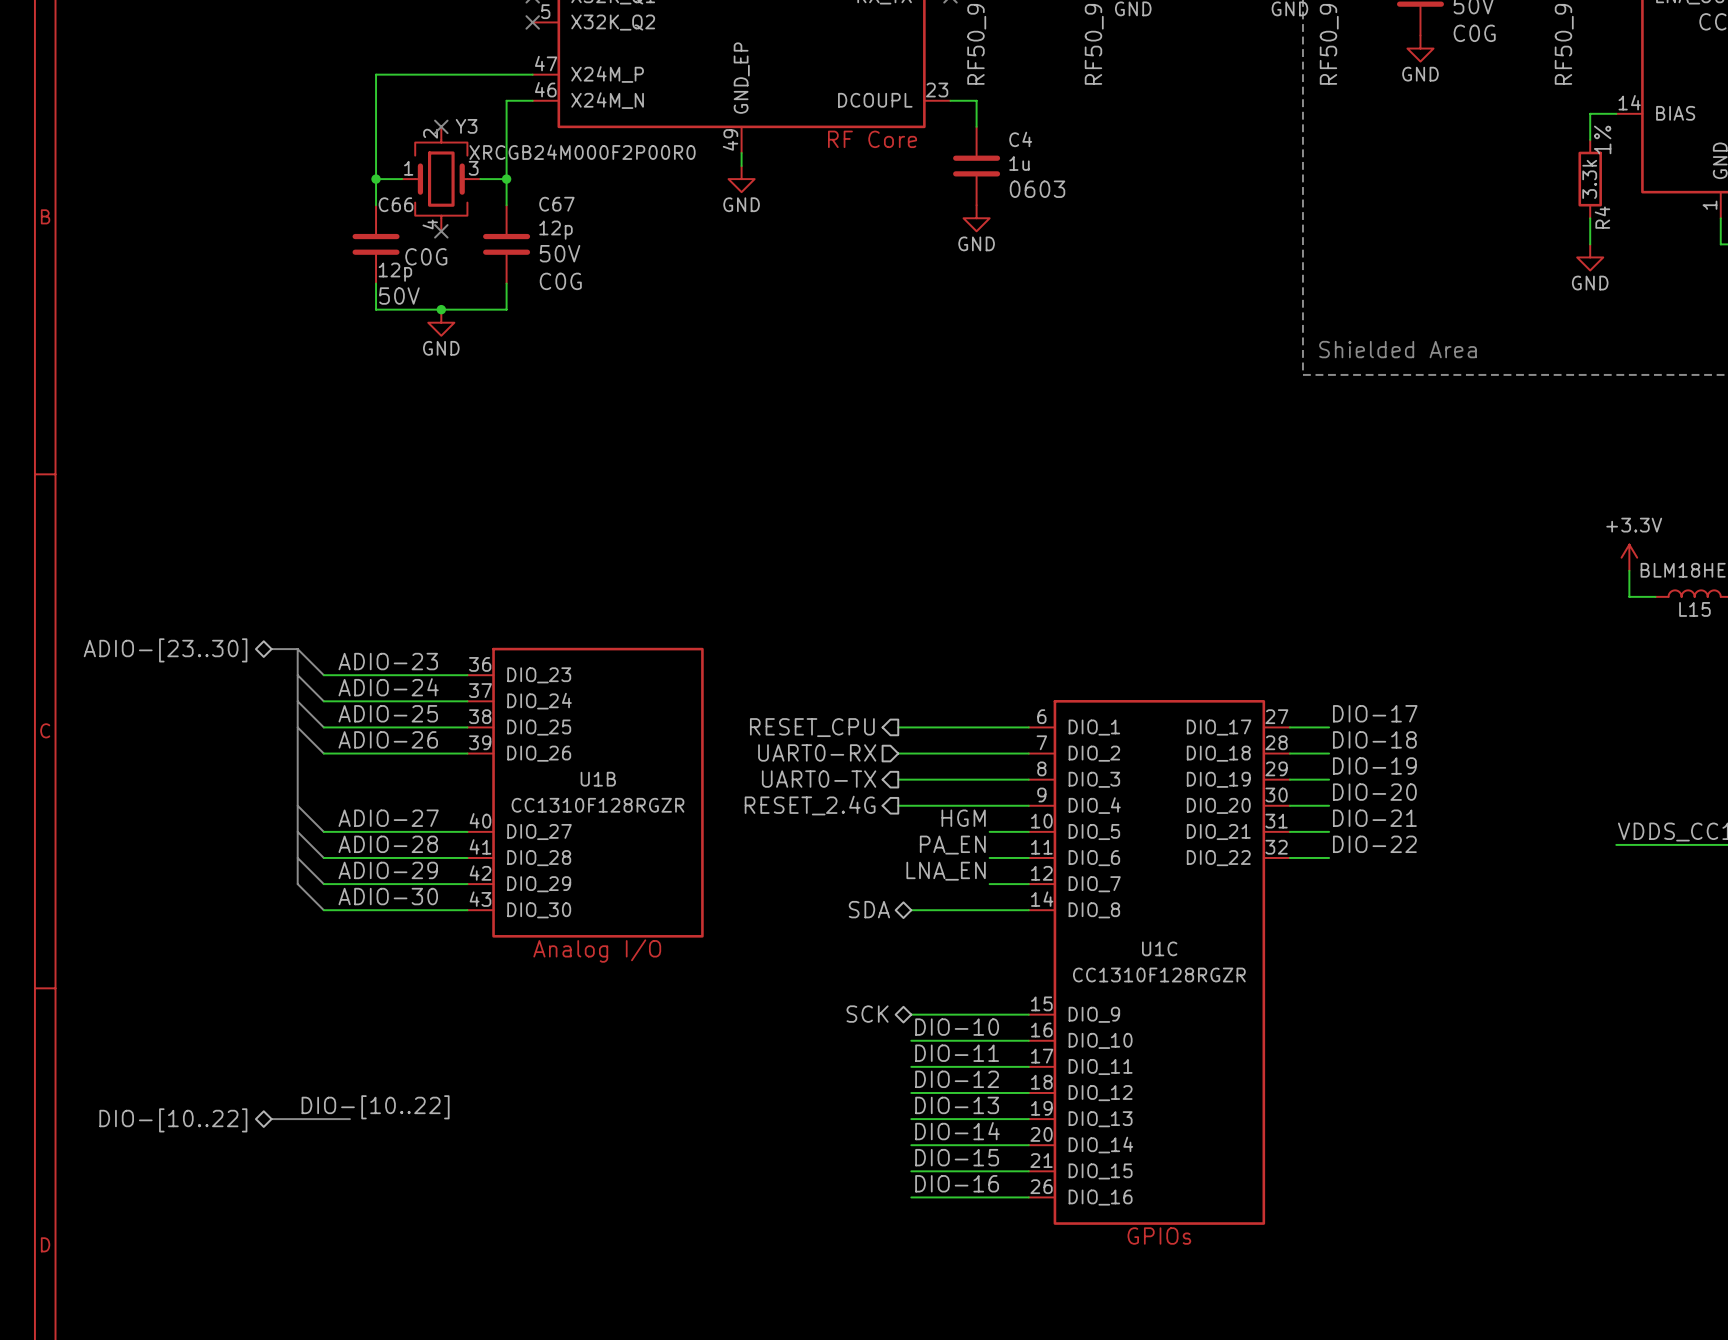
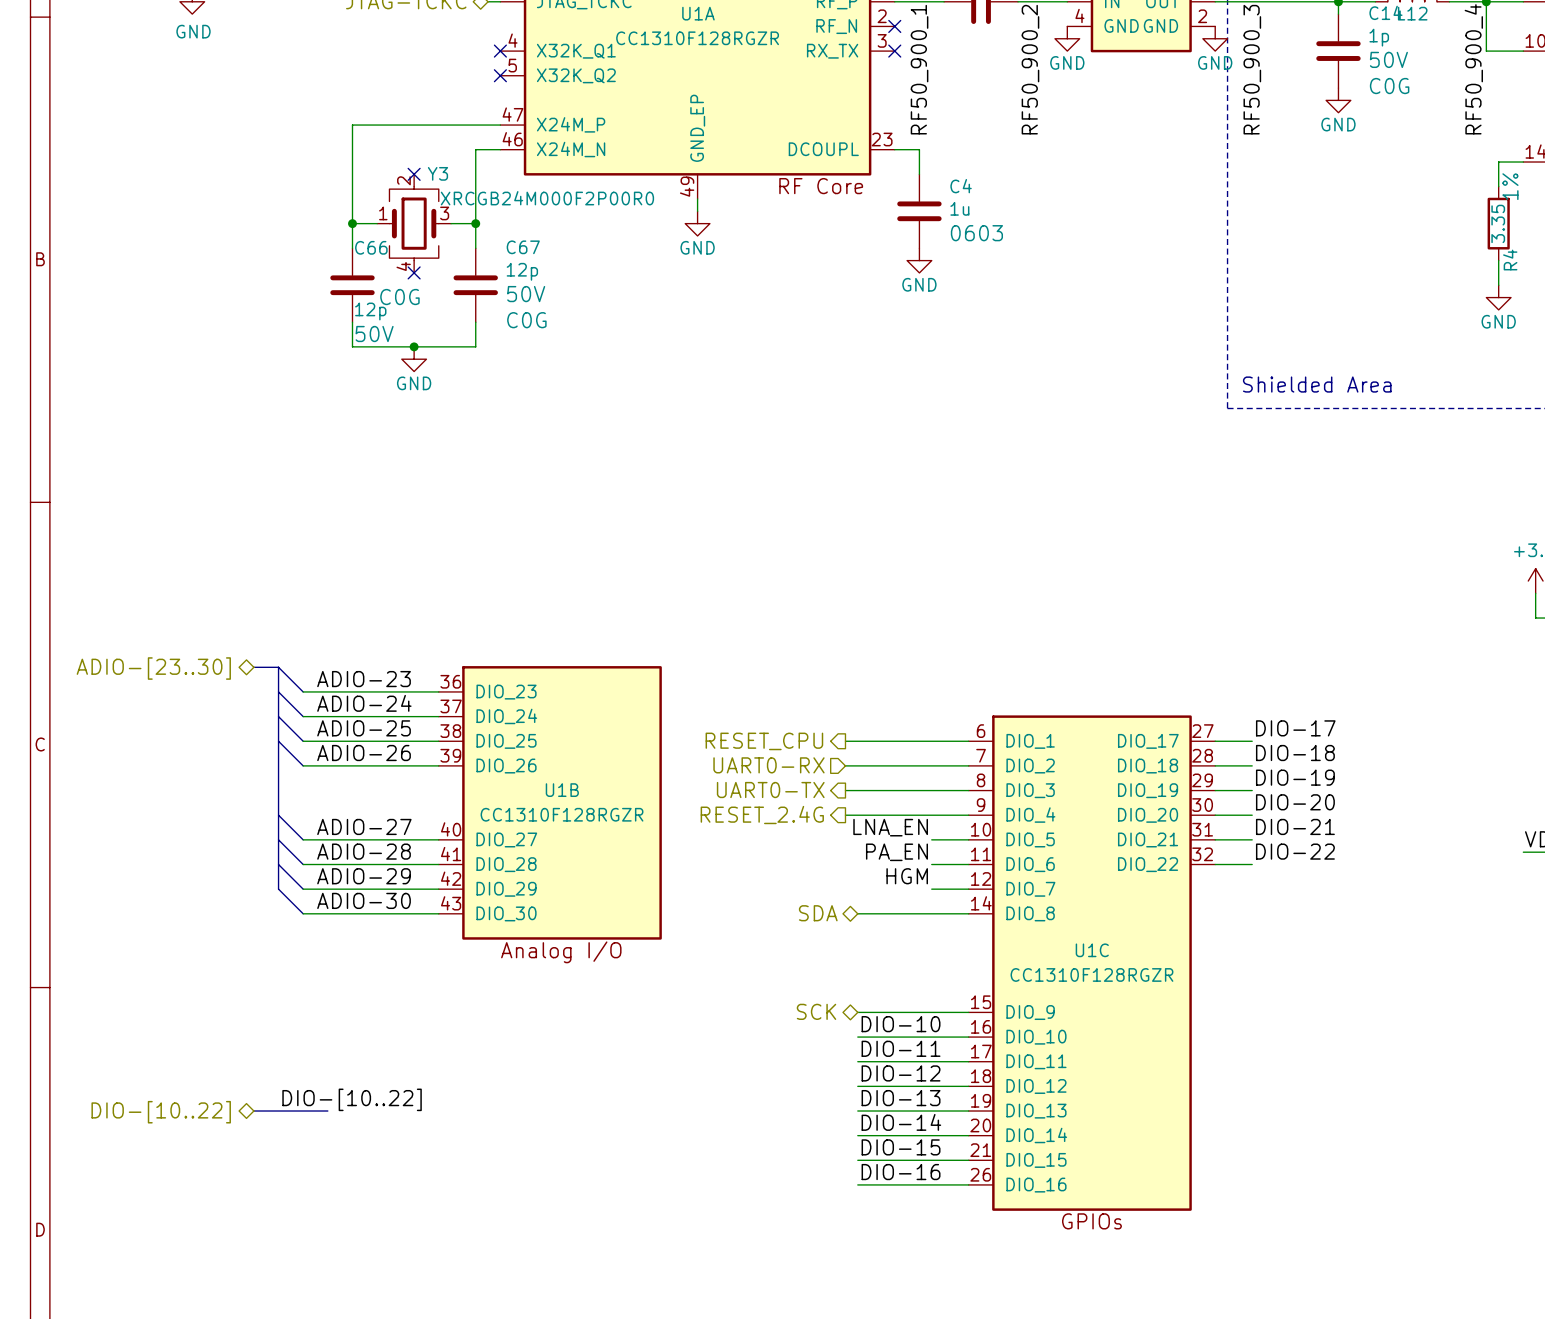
R4 value: 3.3k (1589, 179) -> 3.35 (1498, 223)
label: HGM (963, 818) -> LNA_EN (890, 827)
label: LNA_EN (946, 871) -> HGM (907, 876)

